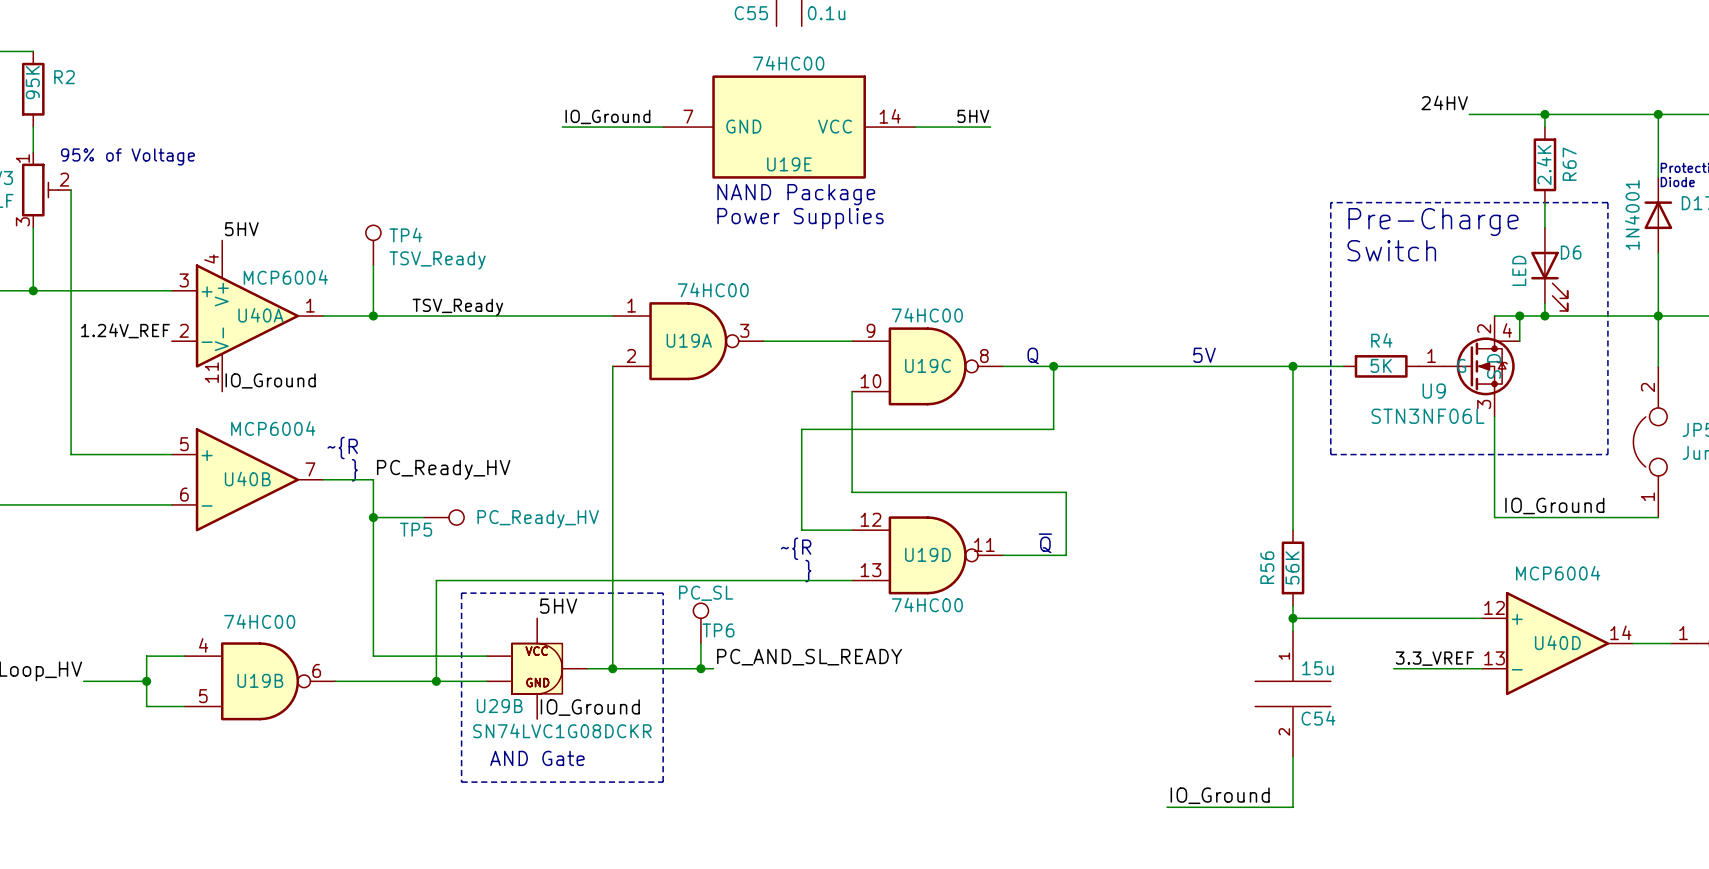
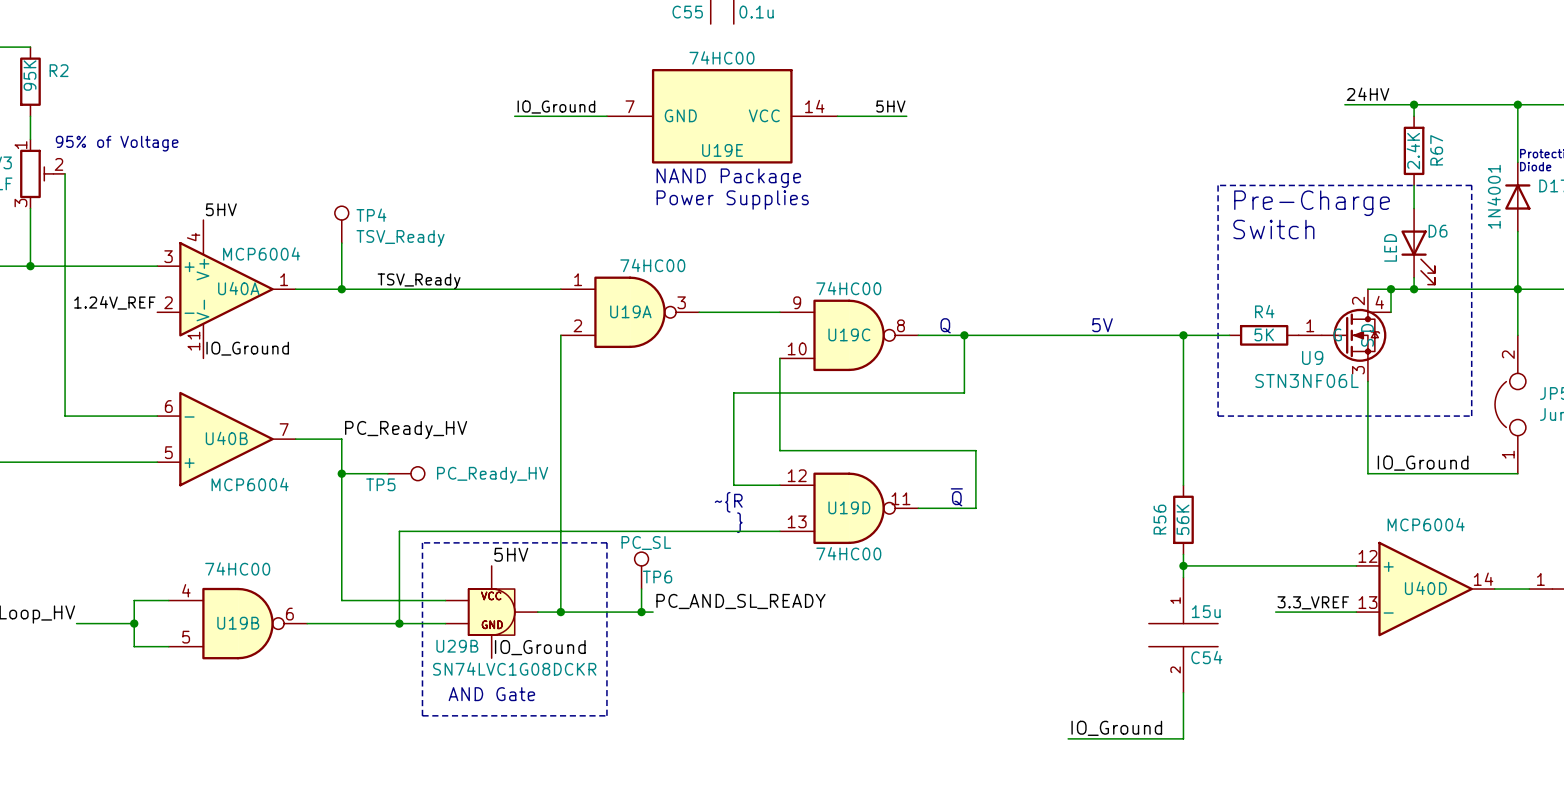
label position: 24HV (1444, 102) -> 24HV (1368, 94)
text: ~{R (342, 448) -> none
text: } (354, 470) -> none
U40B flip: as is (247, 479) -> up-down (226, 439)

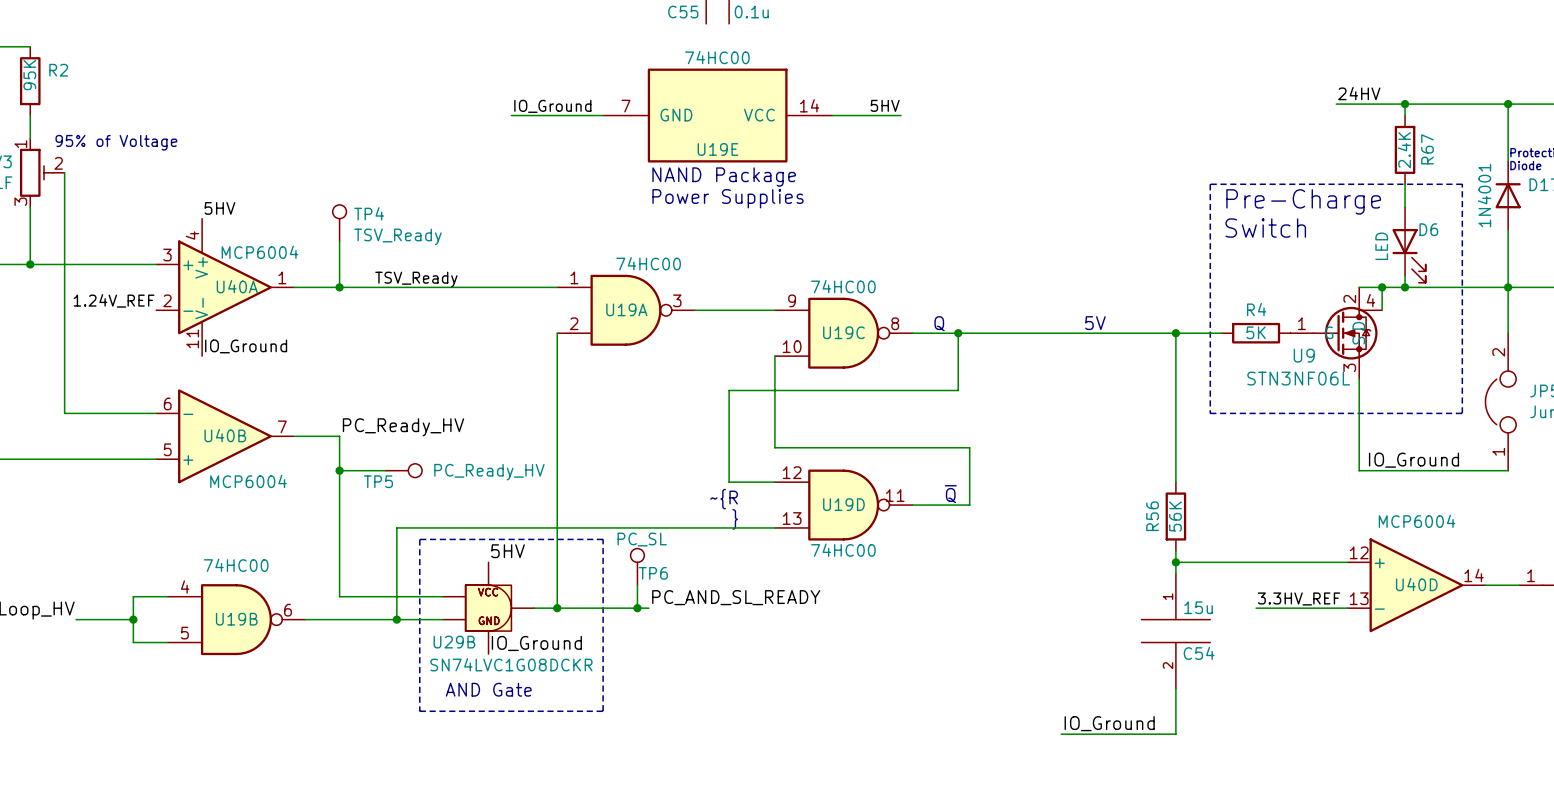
label: 3.3_VREF (1313, 602) -> 3.3HV_REF (1299, 598)
wire: none -> (1256, 608) (1267, 608)

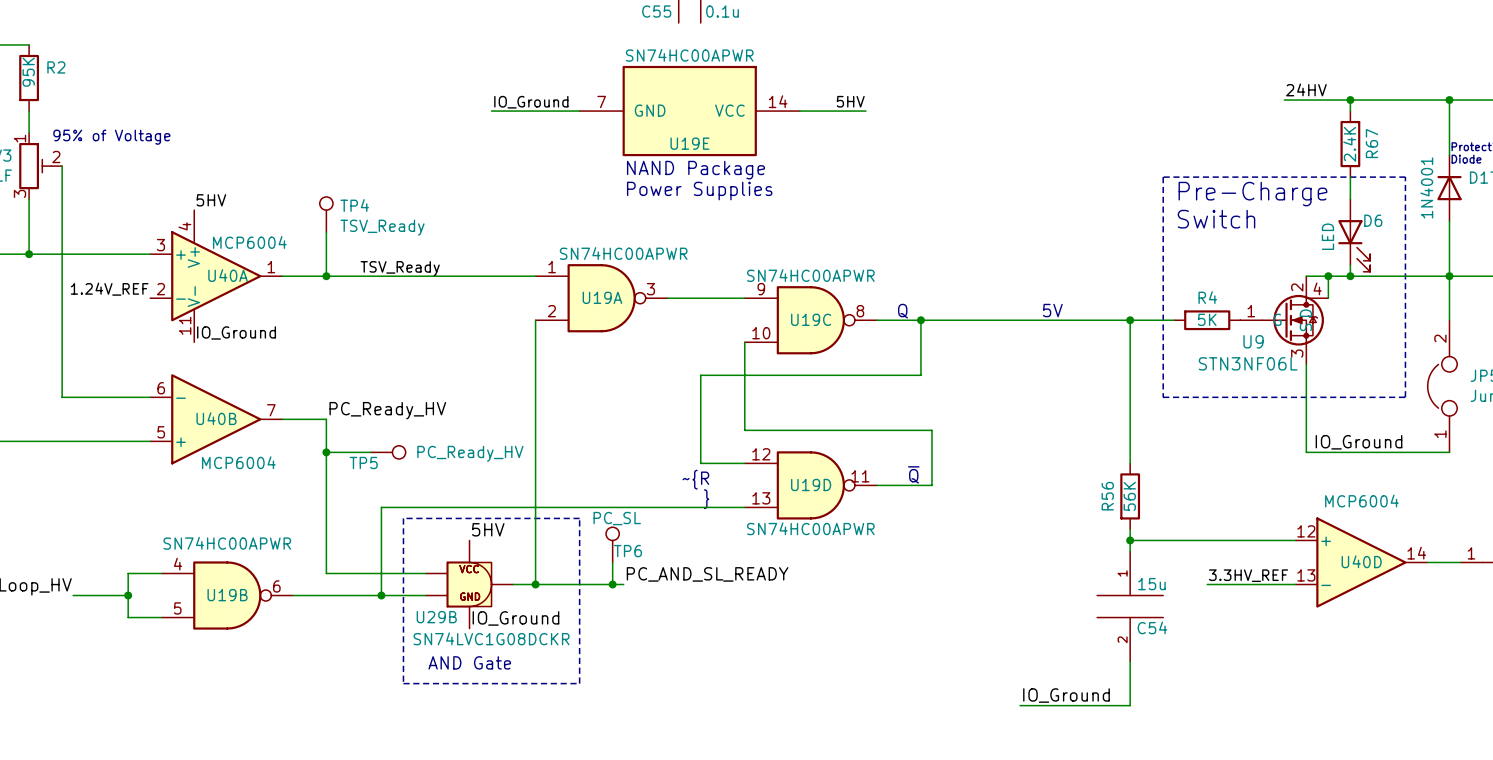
U19E value: 74HC00 (717, 57) -> SN74HC00APWR (689, 55)
U19A value: 74HC00 (648, 263) -> SN74HC00APWR (623, 253)
U19C value: 74HC00 (843, 286) -> SN74HC00APWR (810, 275)
U19D value: 74HC00 (843, 550) -> SN74HC00APWR (810, 528)
U19B value: 74HC00 (236, 565) -> SN74HC00APWR (227, 543)

